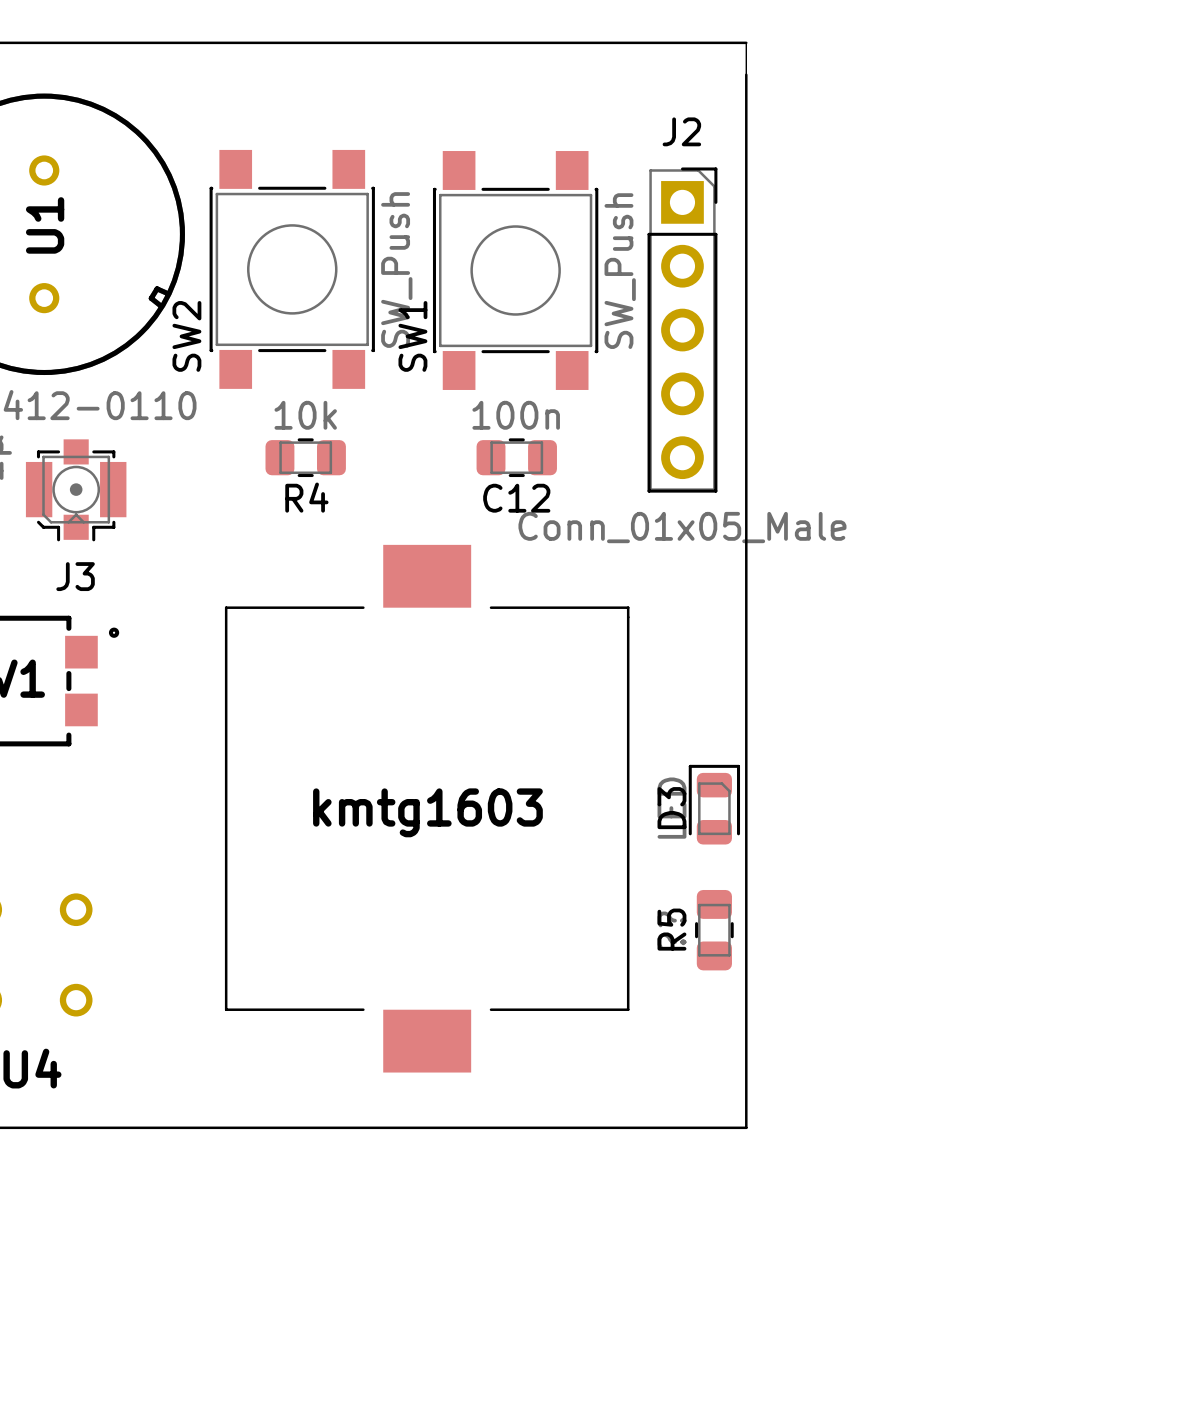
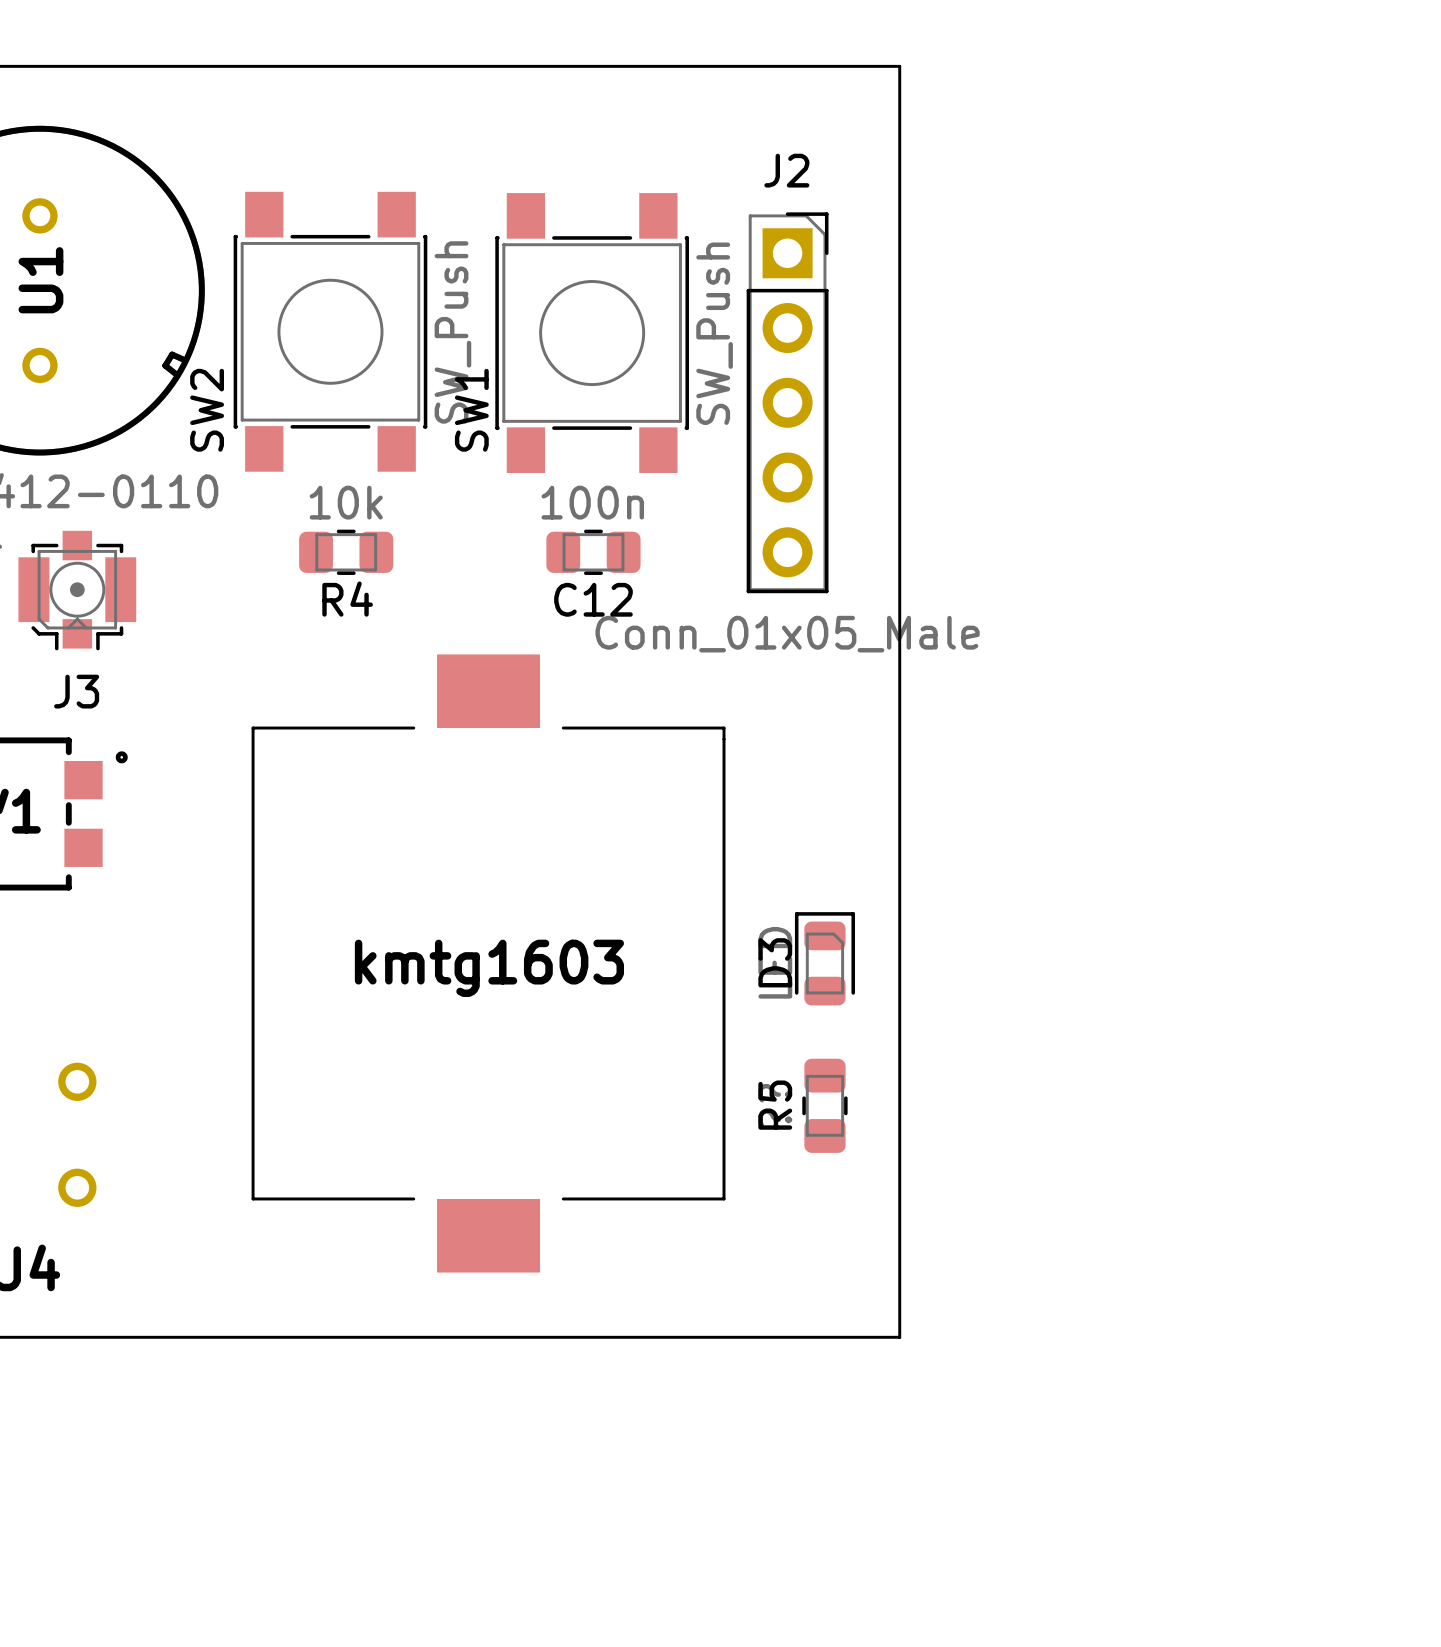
board edge: (746, 42) (746, 1127) -> (862, 66) (899, 66) (899, 1337) (862, 1337)

